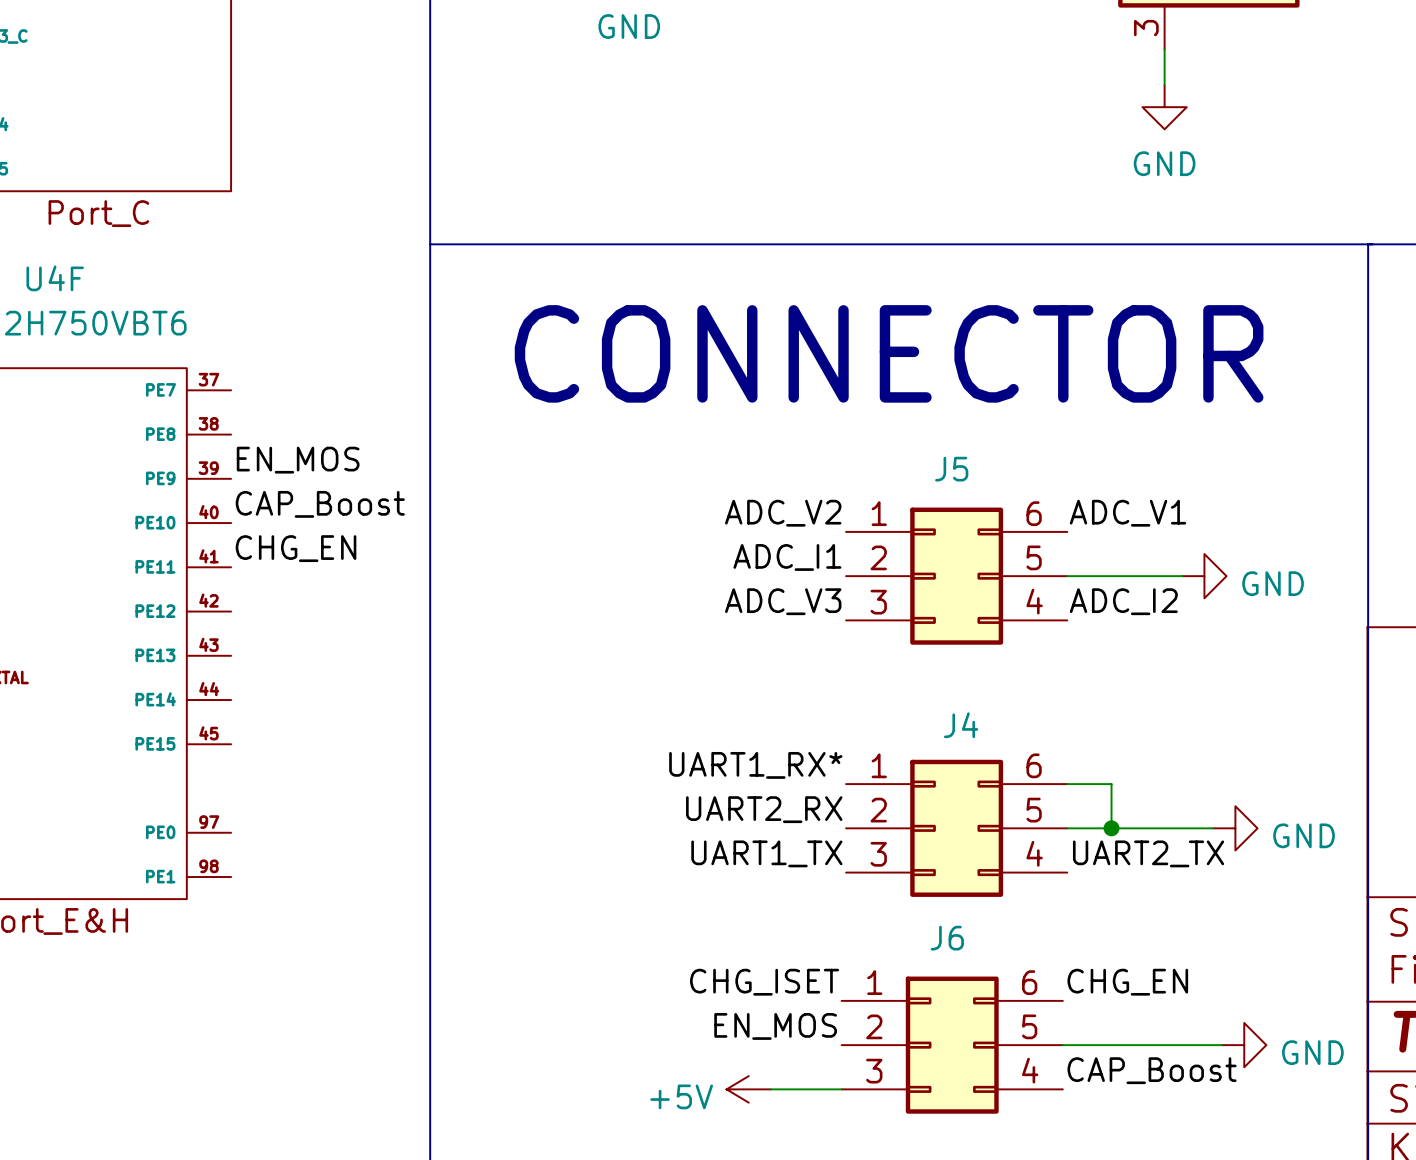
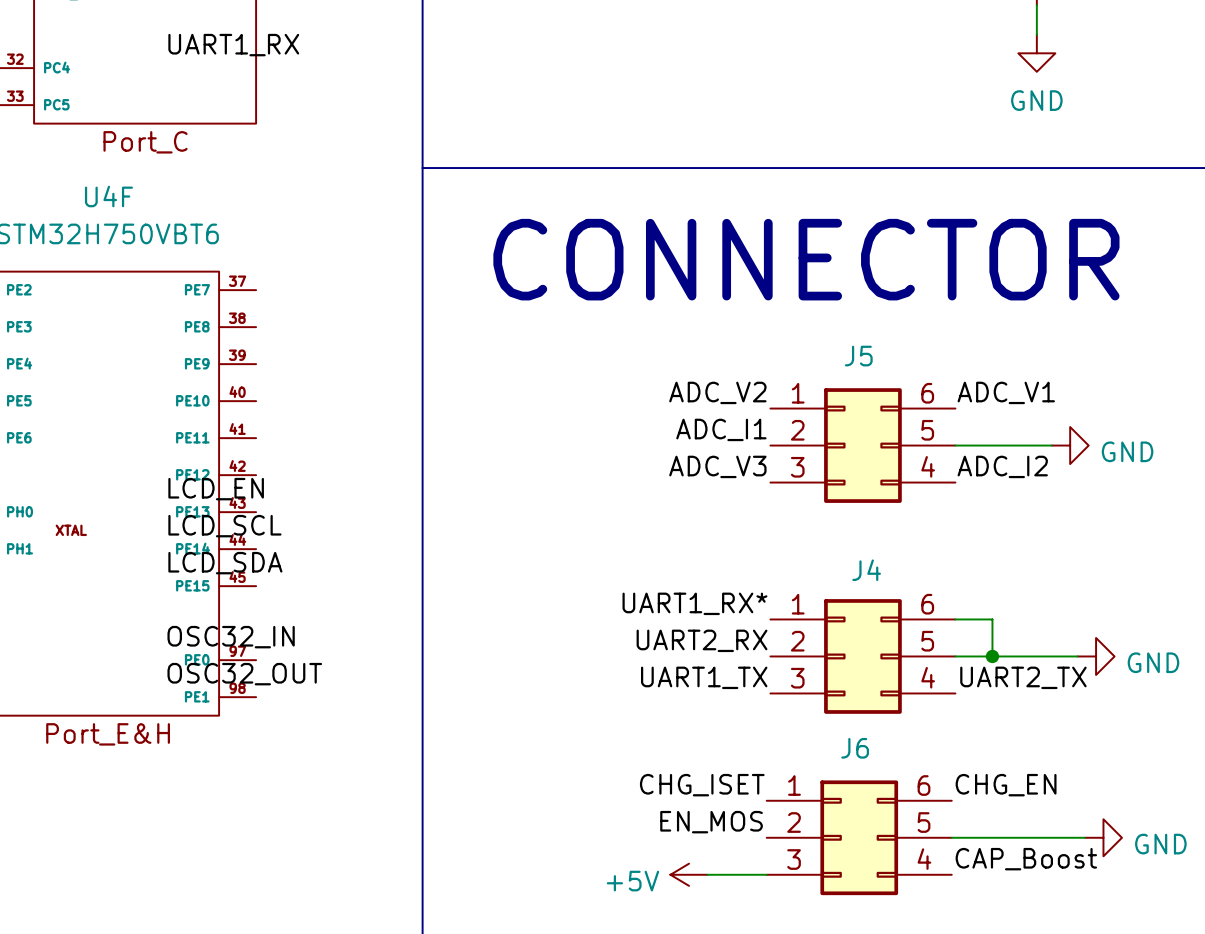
label: none -> UART1_RX (233, 45)
label: EN_MOS (298, 460) -> none
label: CAP_Boost (320, 504) -> none
label: CHG_EN (296, 548) -> none
label: none -> LCD_EN (216, 489)
label: none -> LCD_SCL (224, 526)
label: none -> LCD_SDA (225, 563)
label: none -> OSC32_IN (231, 637)
label: none -> OSC32_OUT (244, 674)

